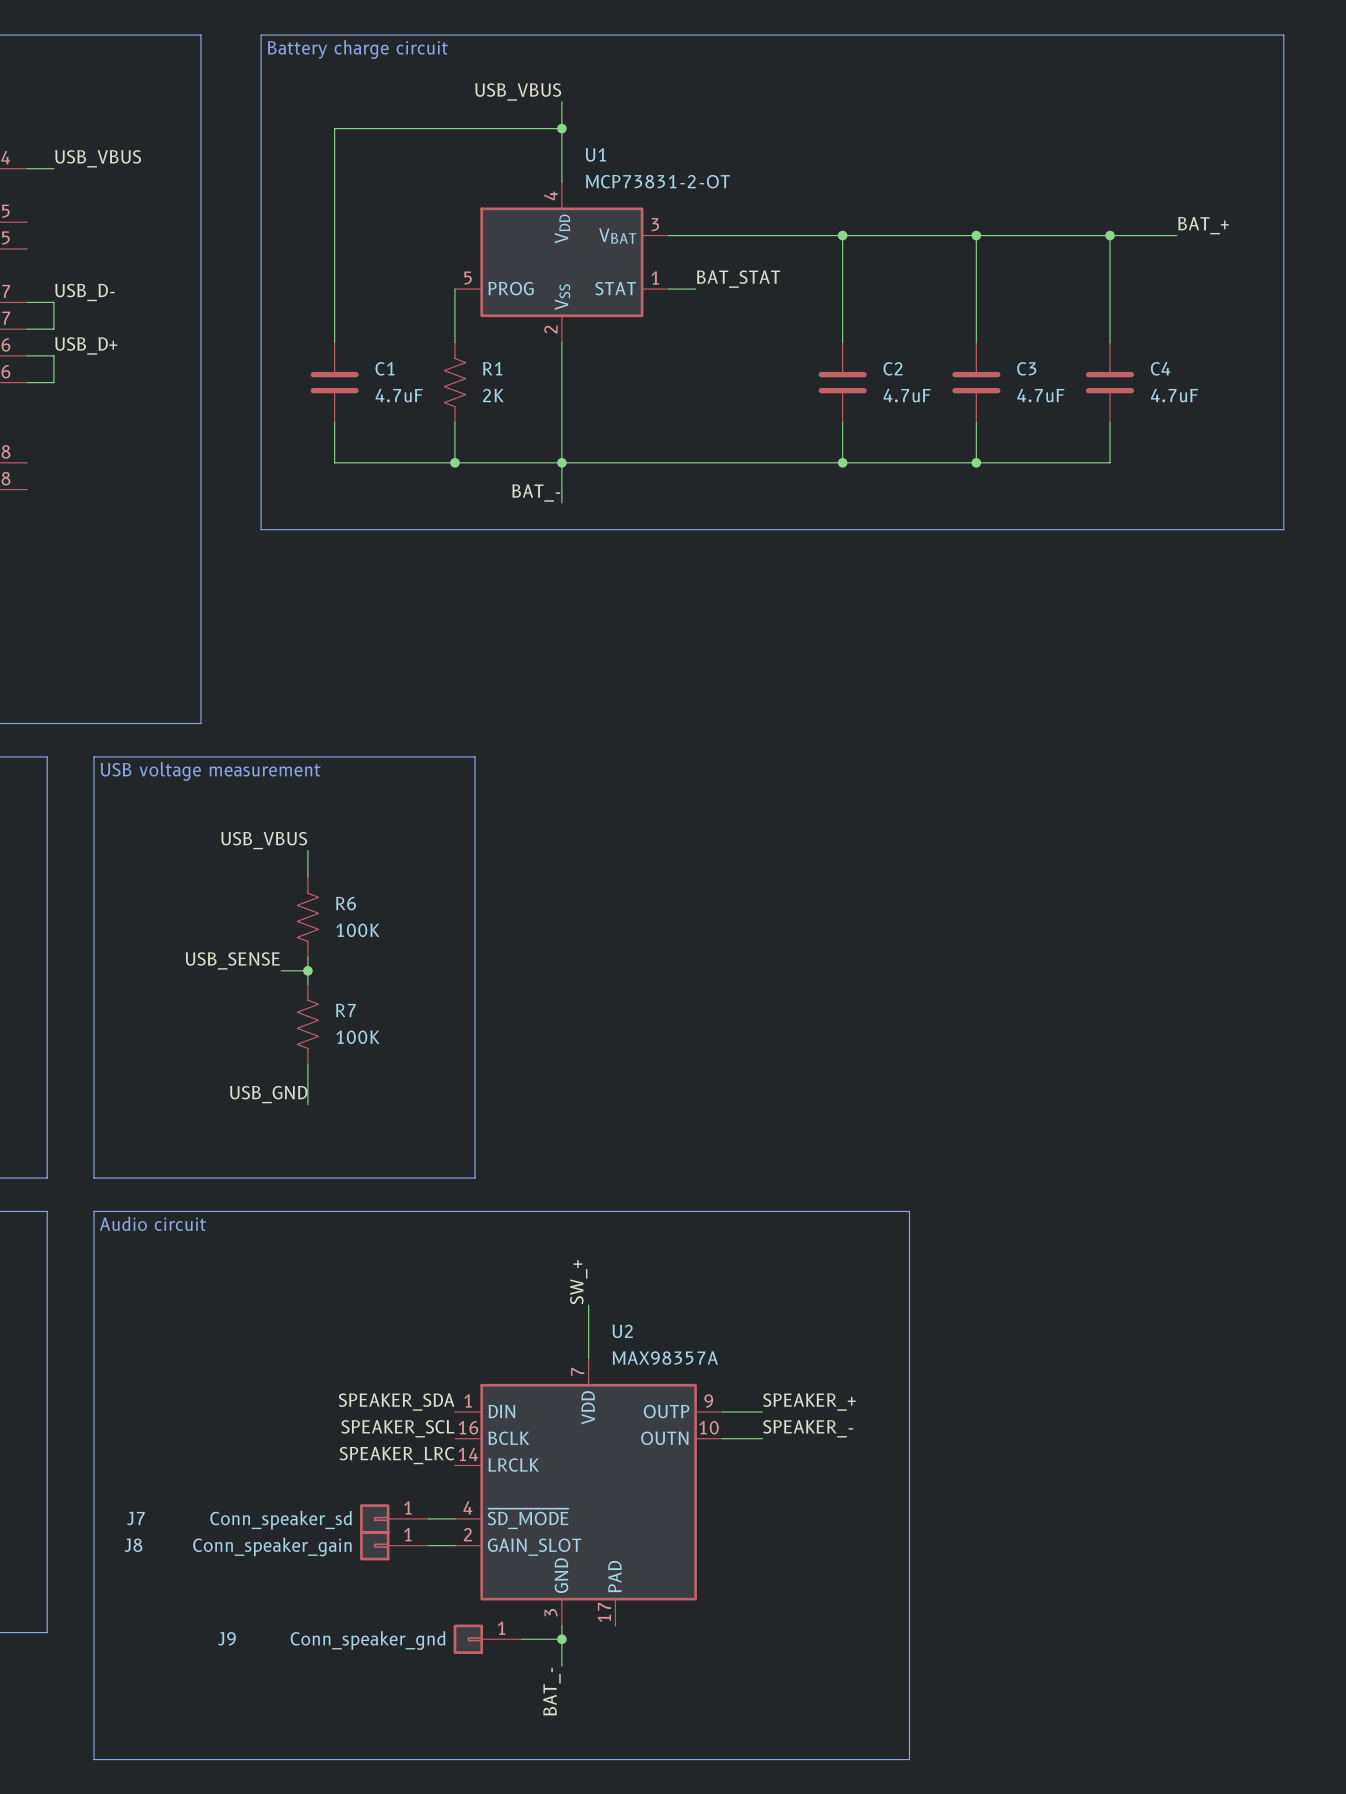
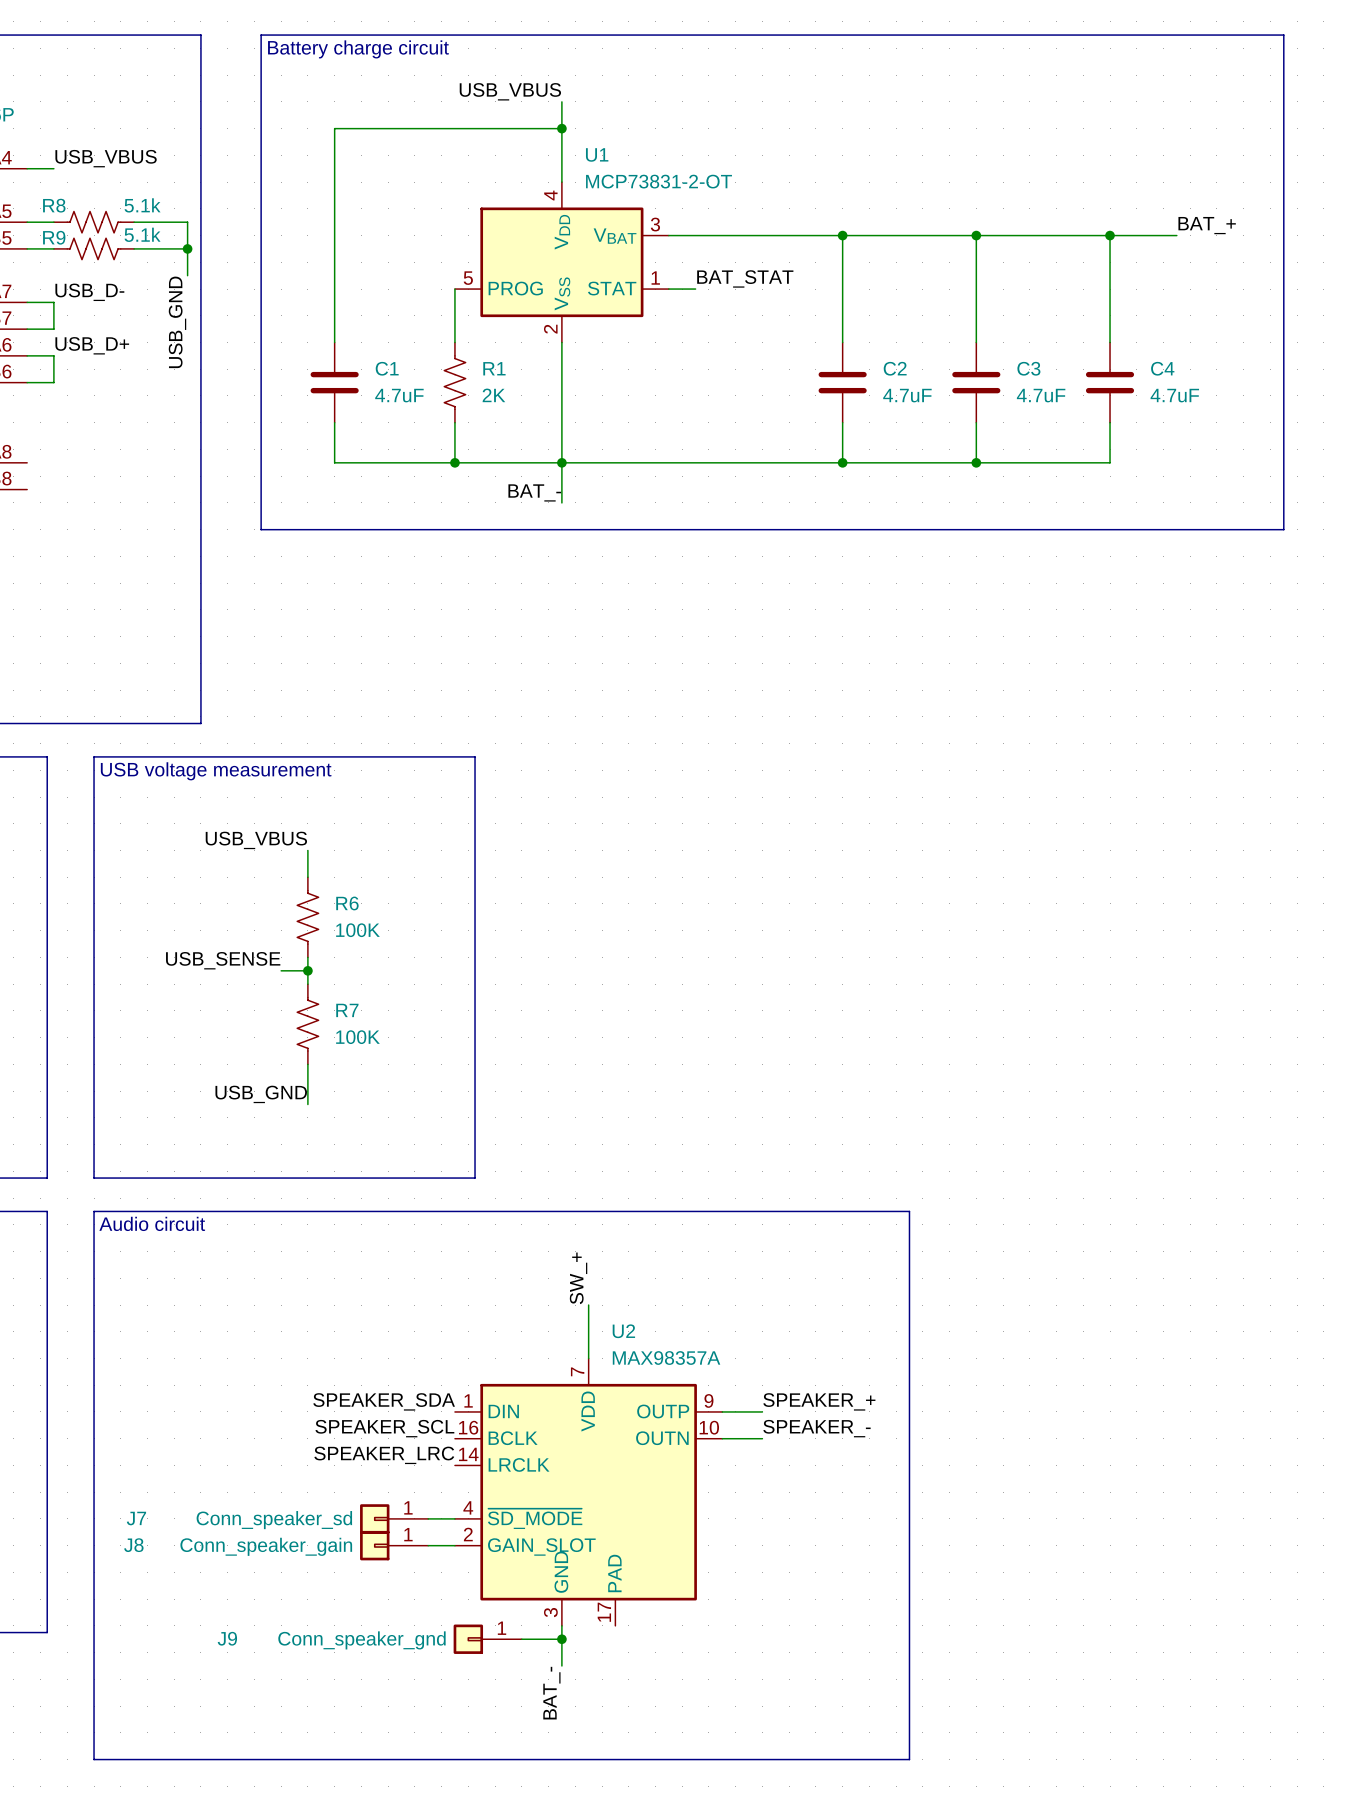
wire: none -> (27, 222) (53, 222)
R8: none -> 5.1k (94, 222)
wire: none -> (134, 222) (187, 222) (187, 275)
wire: none -> (27, 248) (53, 248)
R9: none -> 5.1k (94, 248)
wire: none -> (134, 248) (187, 248)
junction: none -> (187, 248)
label: none -> USB_GND (177, 322)

